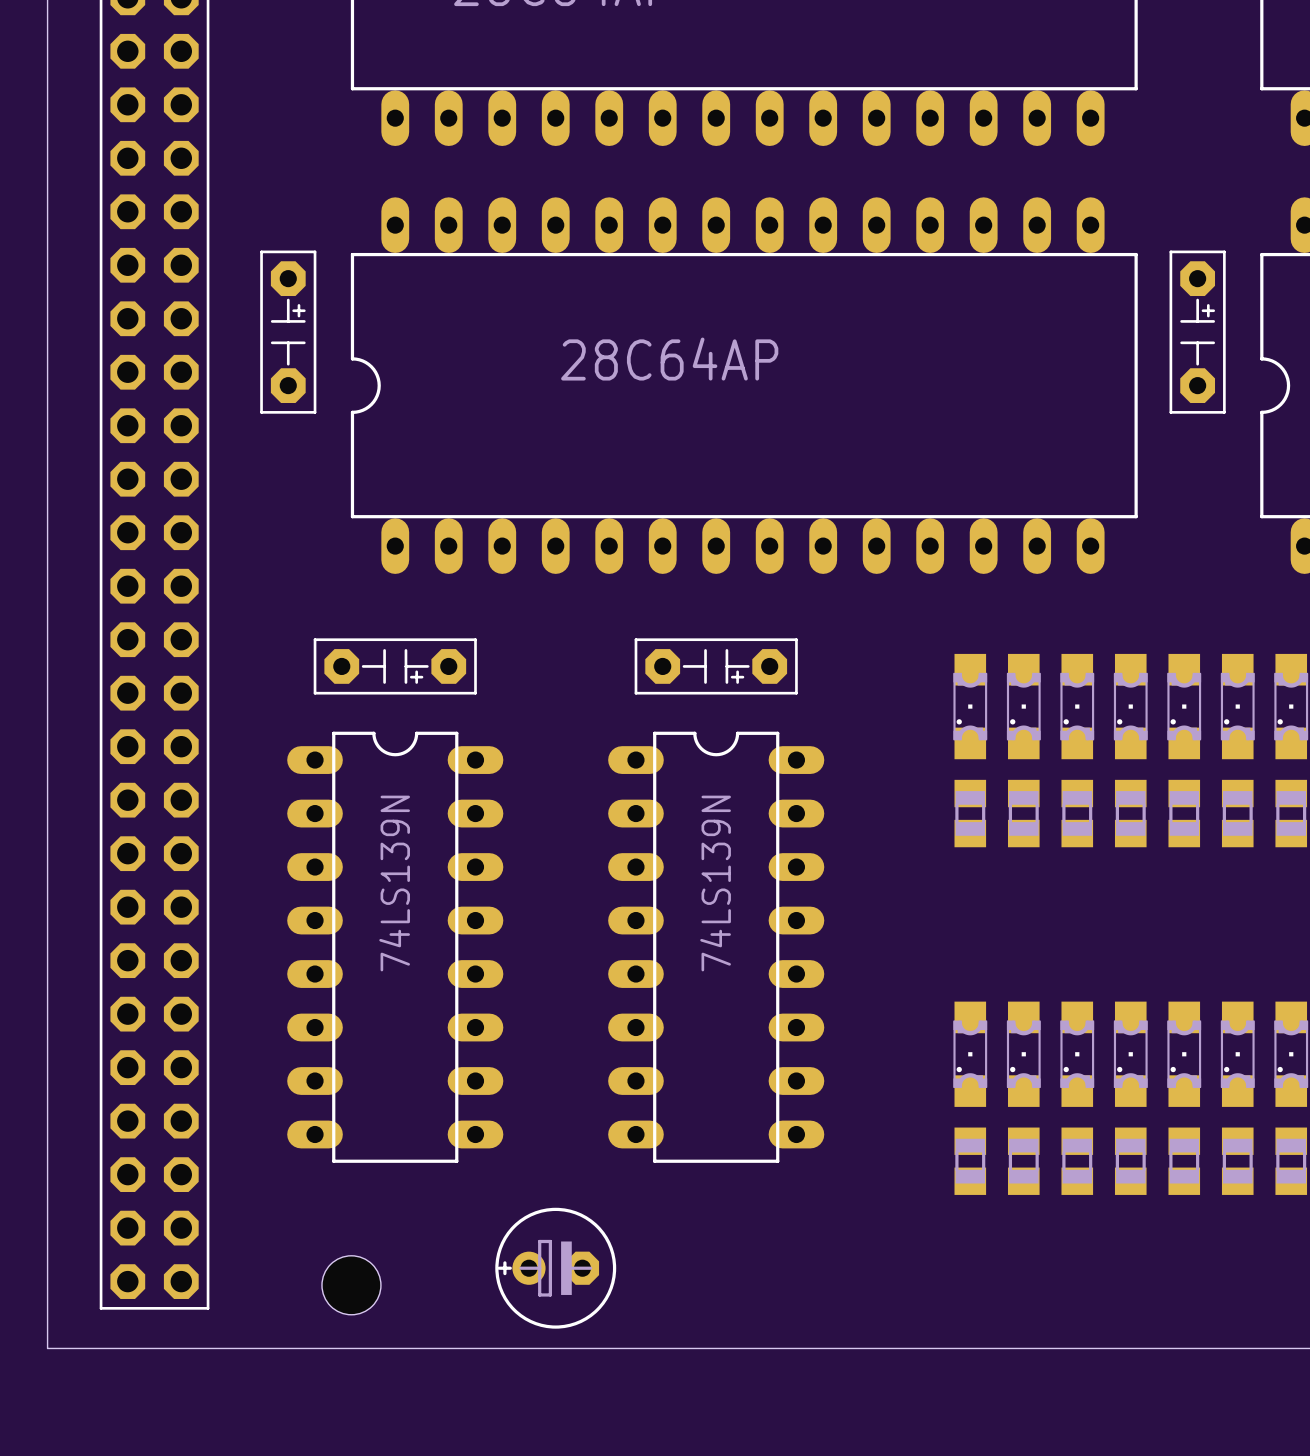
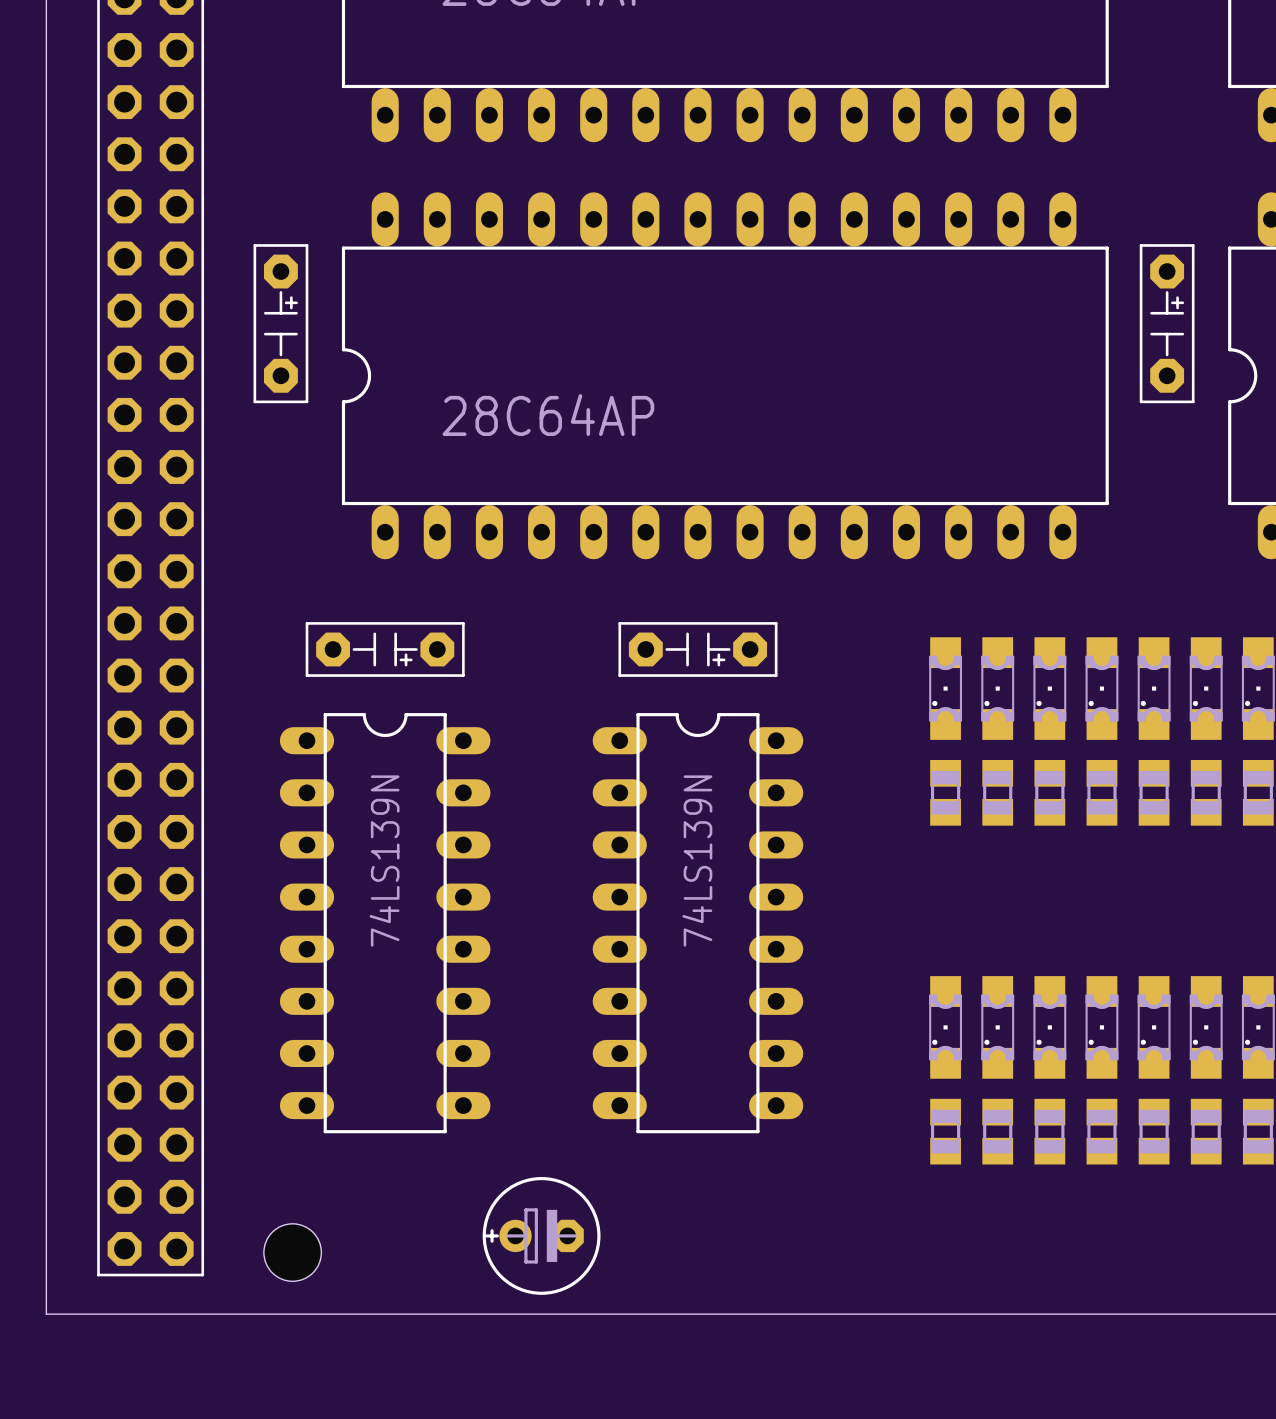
part value position: 28C64AP (669, 359) -> 28C64AP (548, 415)
hole position: (351, 1285) -> (292, 1252)

